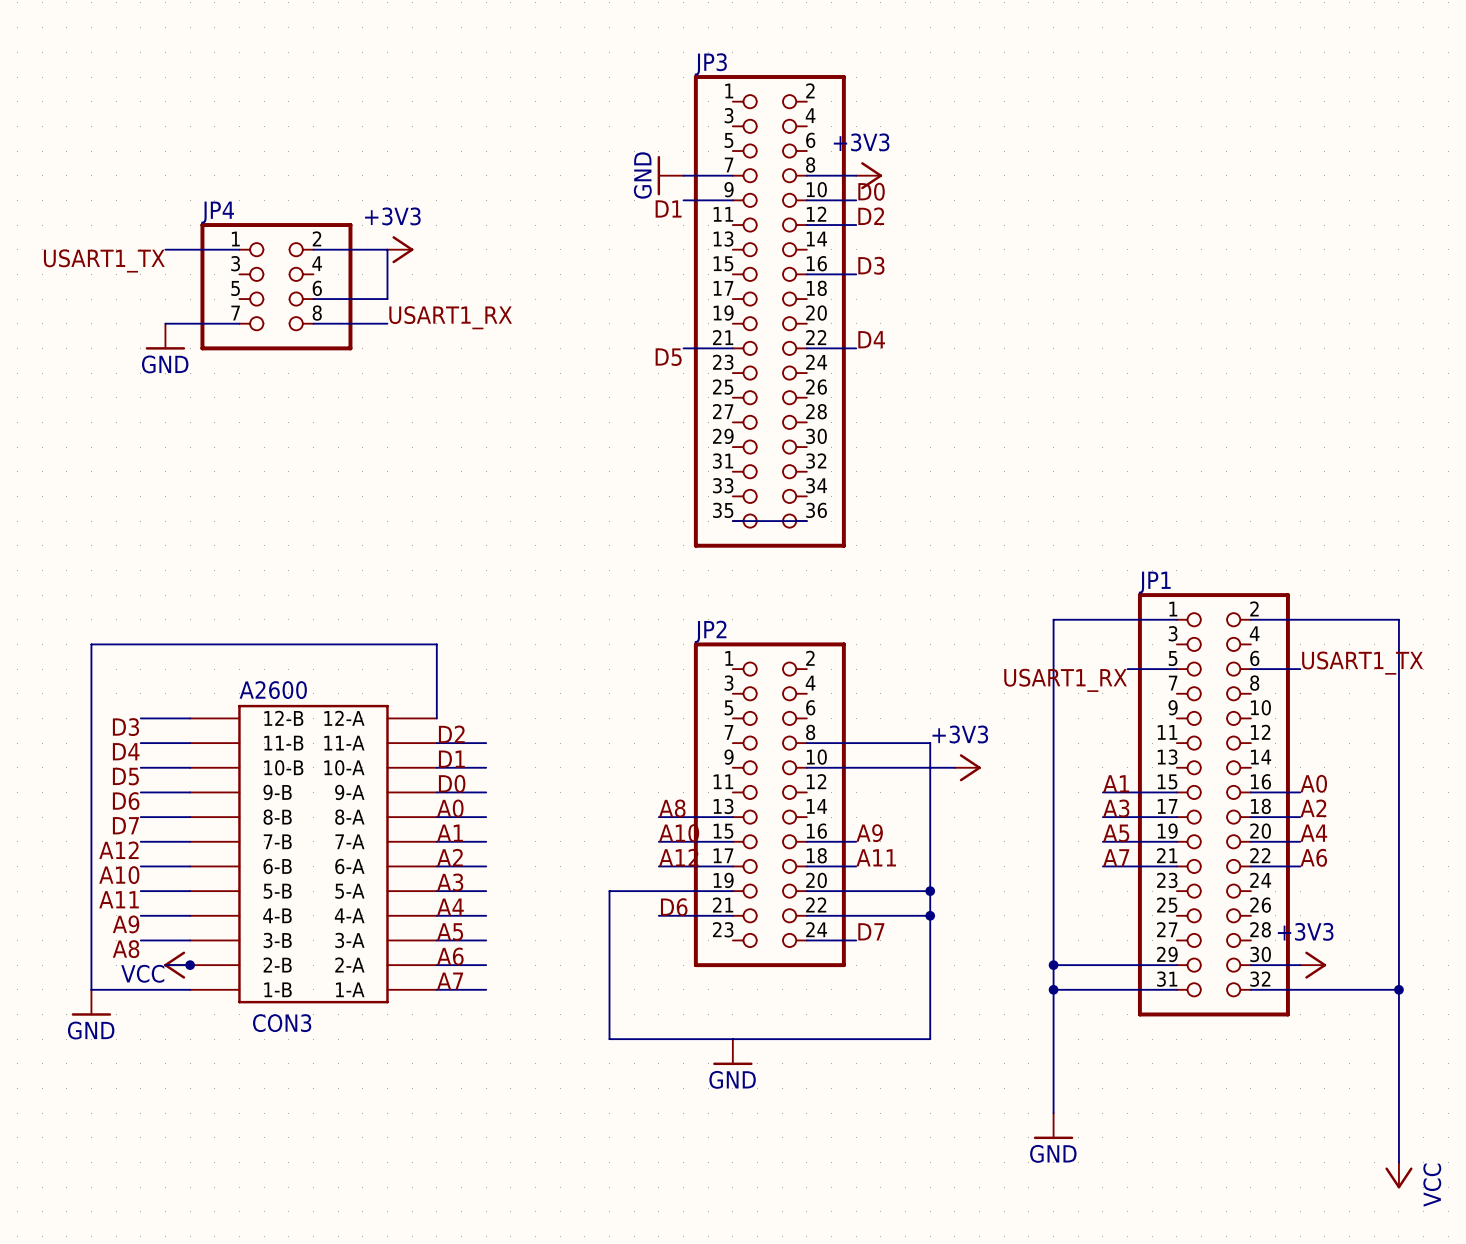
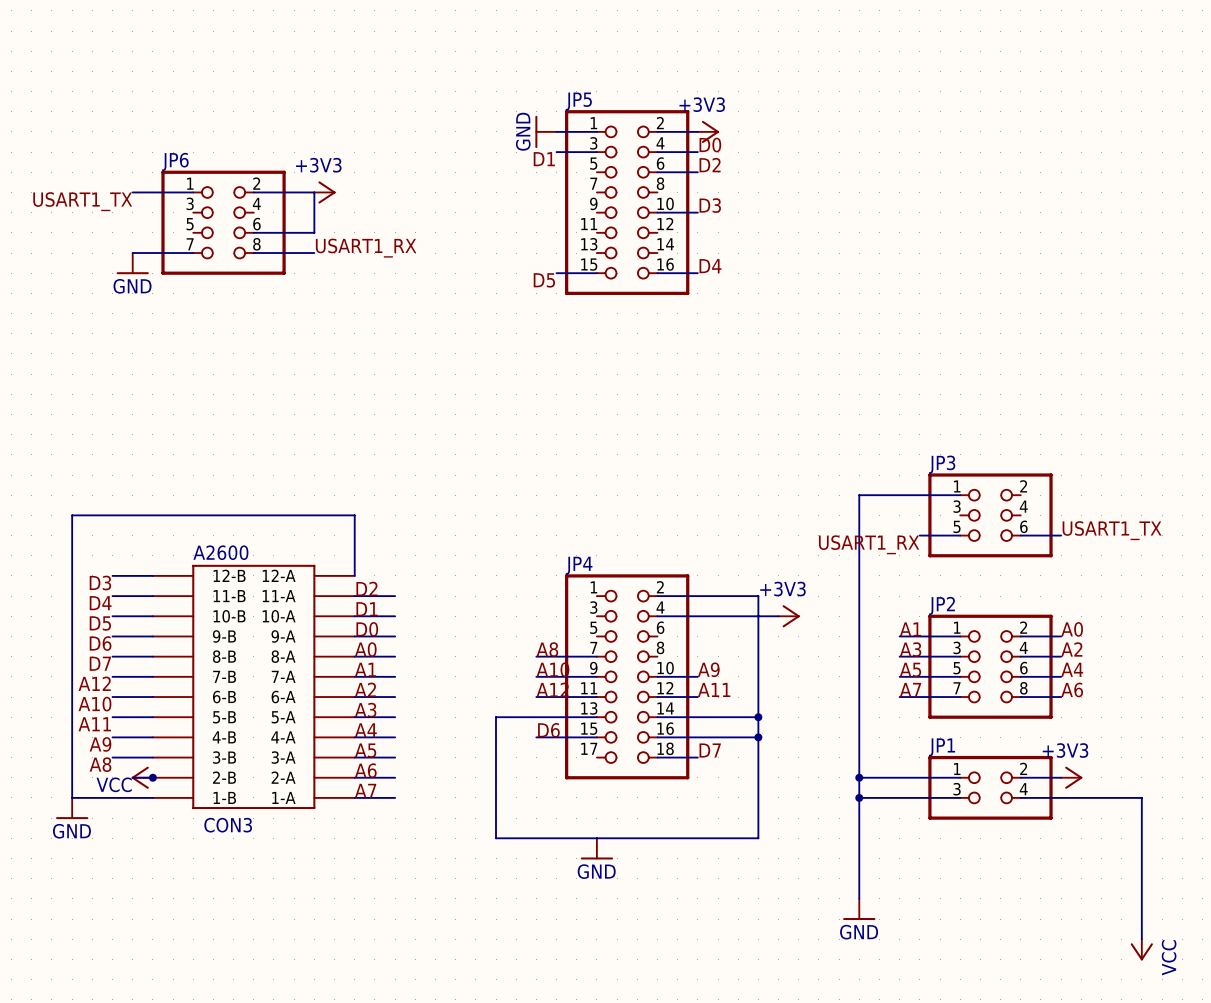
JP3 name position: JP3 (710, 64) -> JP3 (942, 464)
JP3 symbol: [693, 75, 846, 548] -> [928, 473, 1053, 558]
JP4 name: JP4 (217, 212) -> JP6 (175, 161)
JP5: none -> (627, 202)
wire: (732, 521) (806, 521) -> none
JP1 name position: JP1 (1154, 582) -> JP1 (942, 747)
JP1 symbol: [1137, 593, 1290, 1017] -> [928, 755, 1053, 820]
wire: (1250, 619) (1398, 619) (1398, 989) -> none
JP2 name position: JP2 (710, 631) -> JP2 (941, 605)
JP2 symbol: [693, 642, 846, 968] -> [928, 614, 1053, 719]
JP4: none -> (627, 676)
junction: (1398, 989) -> none

